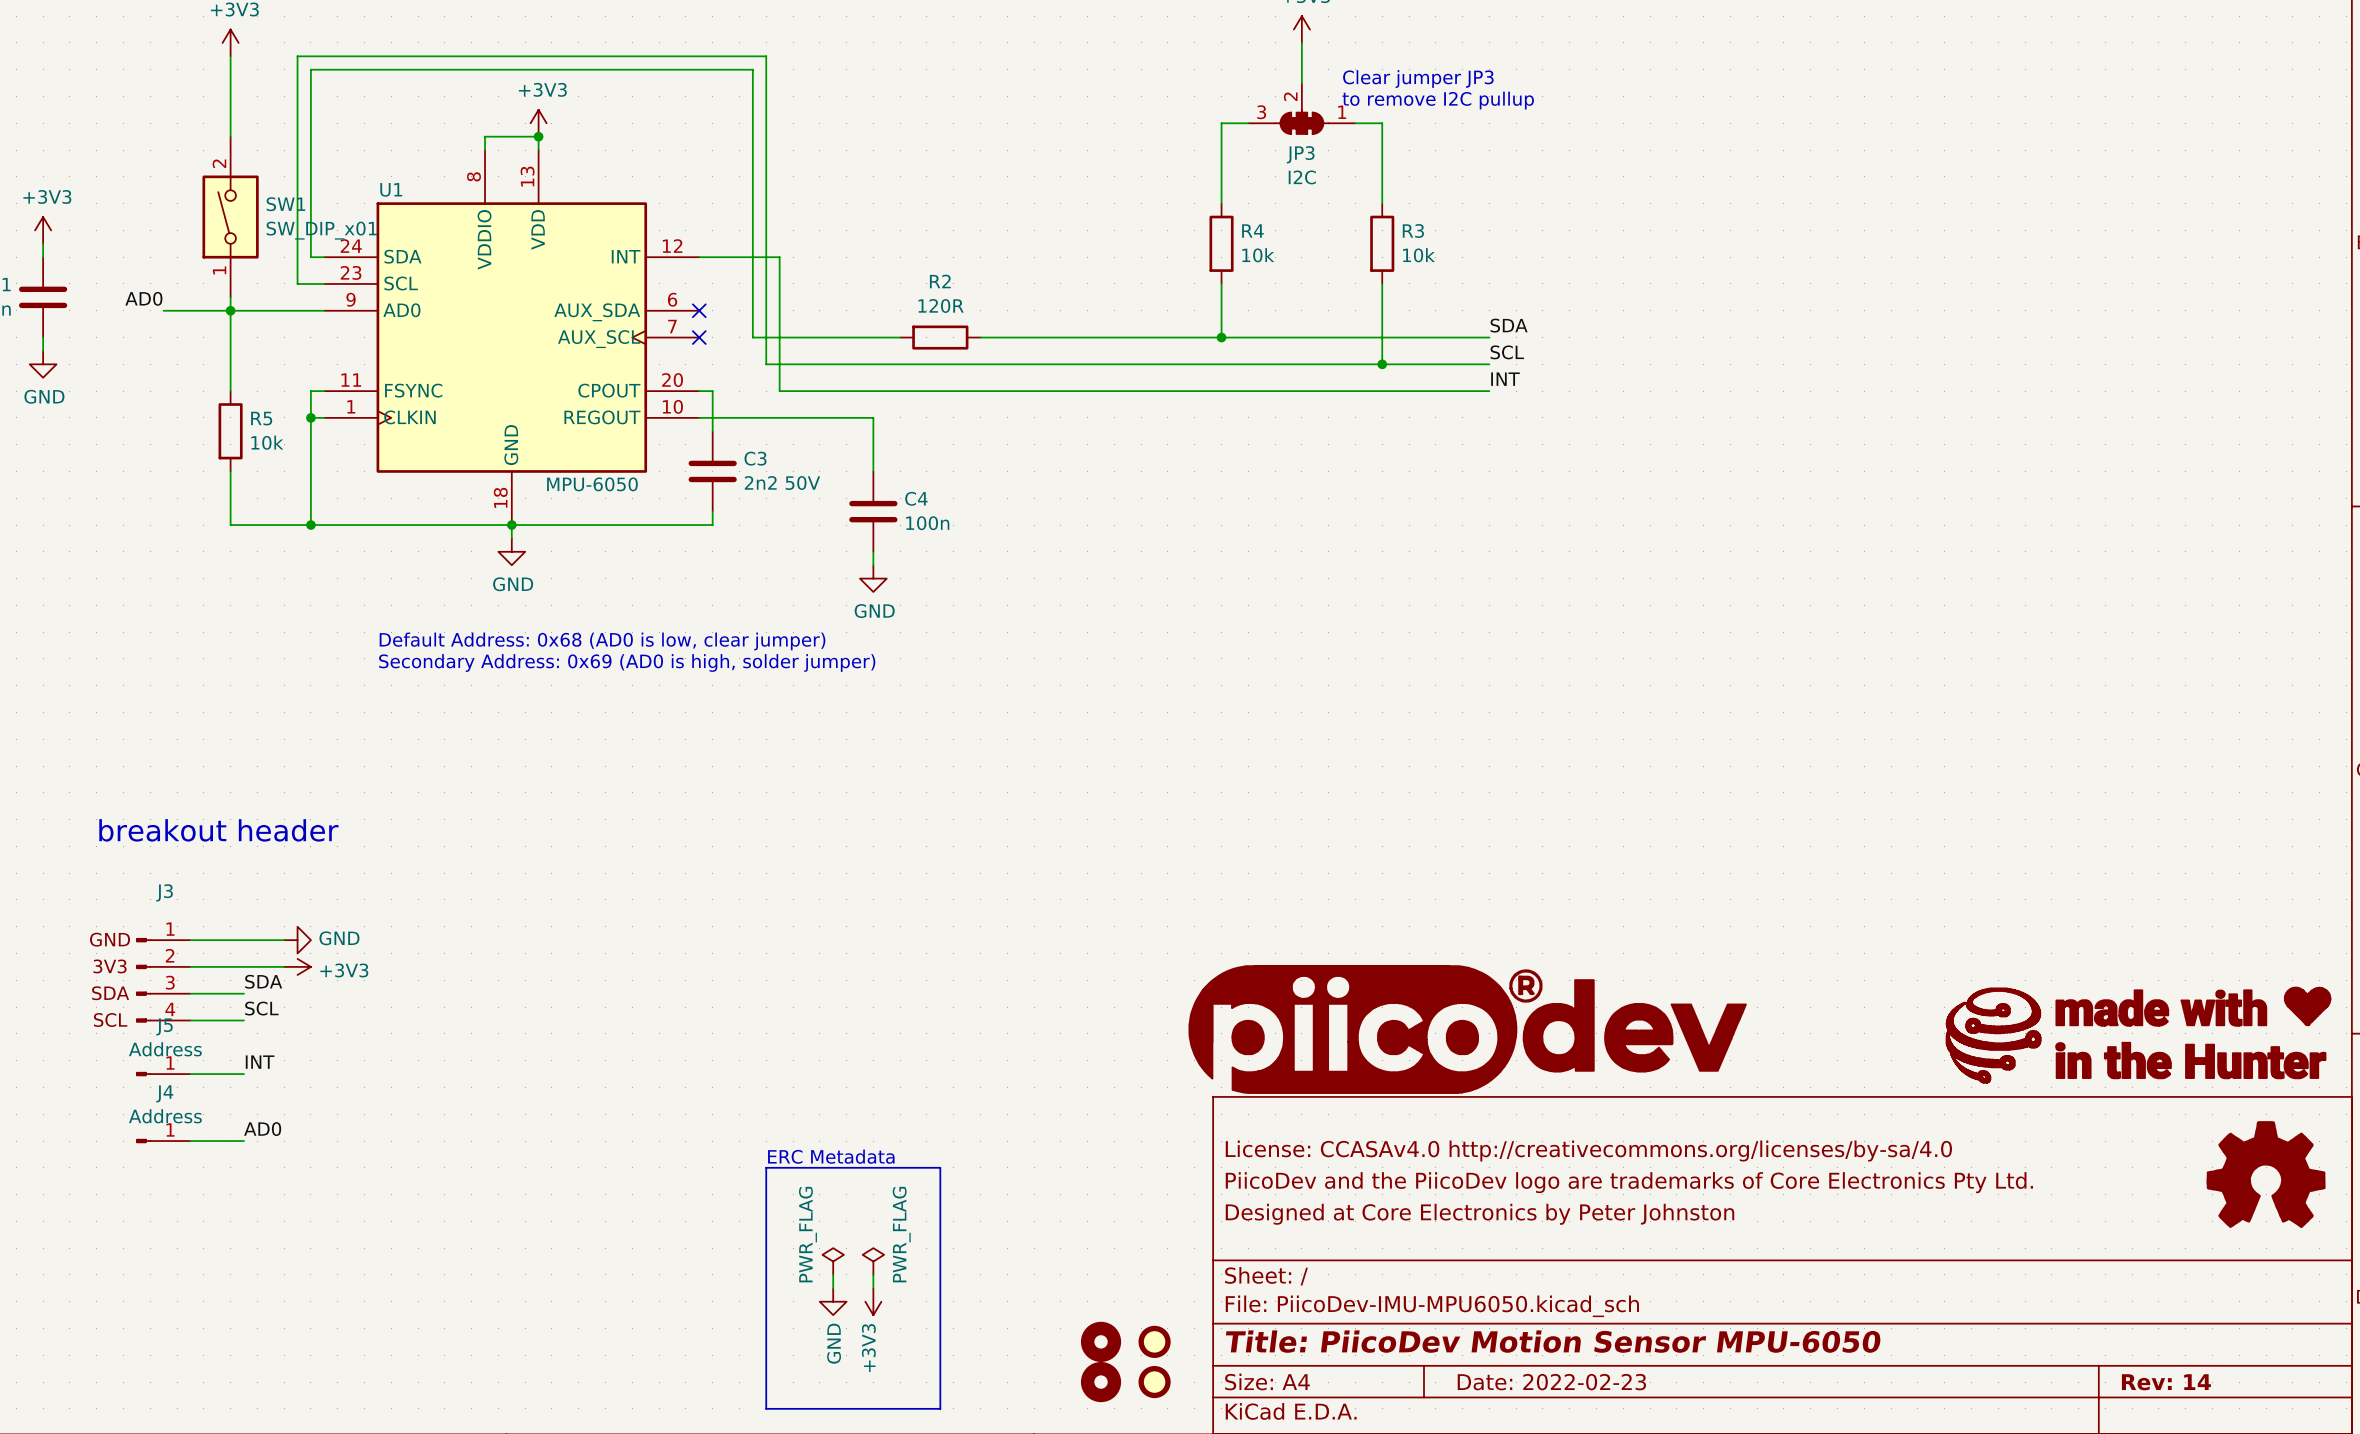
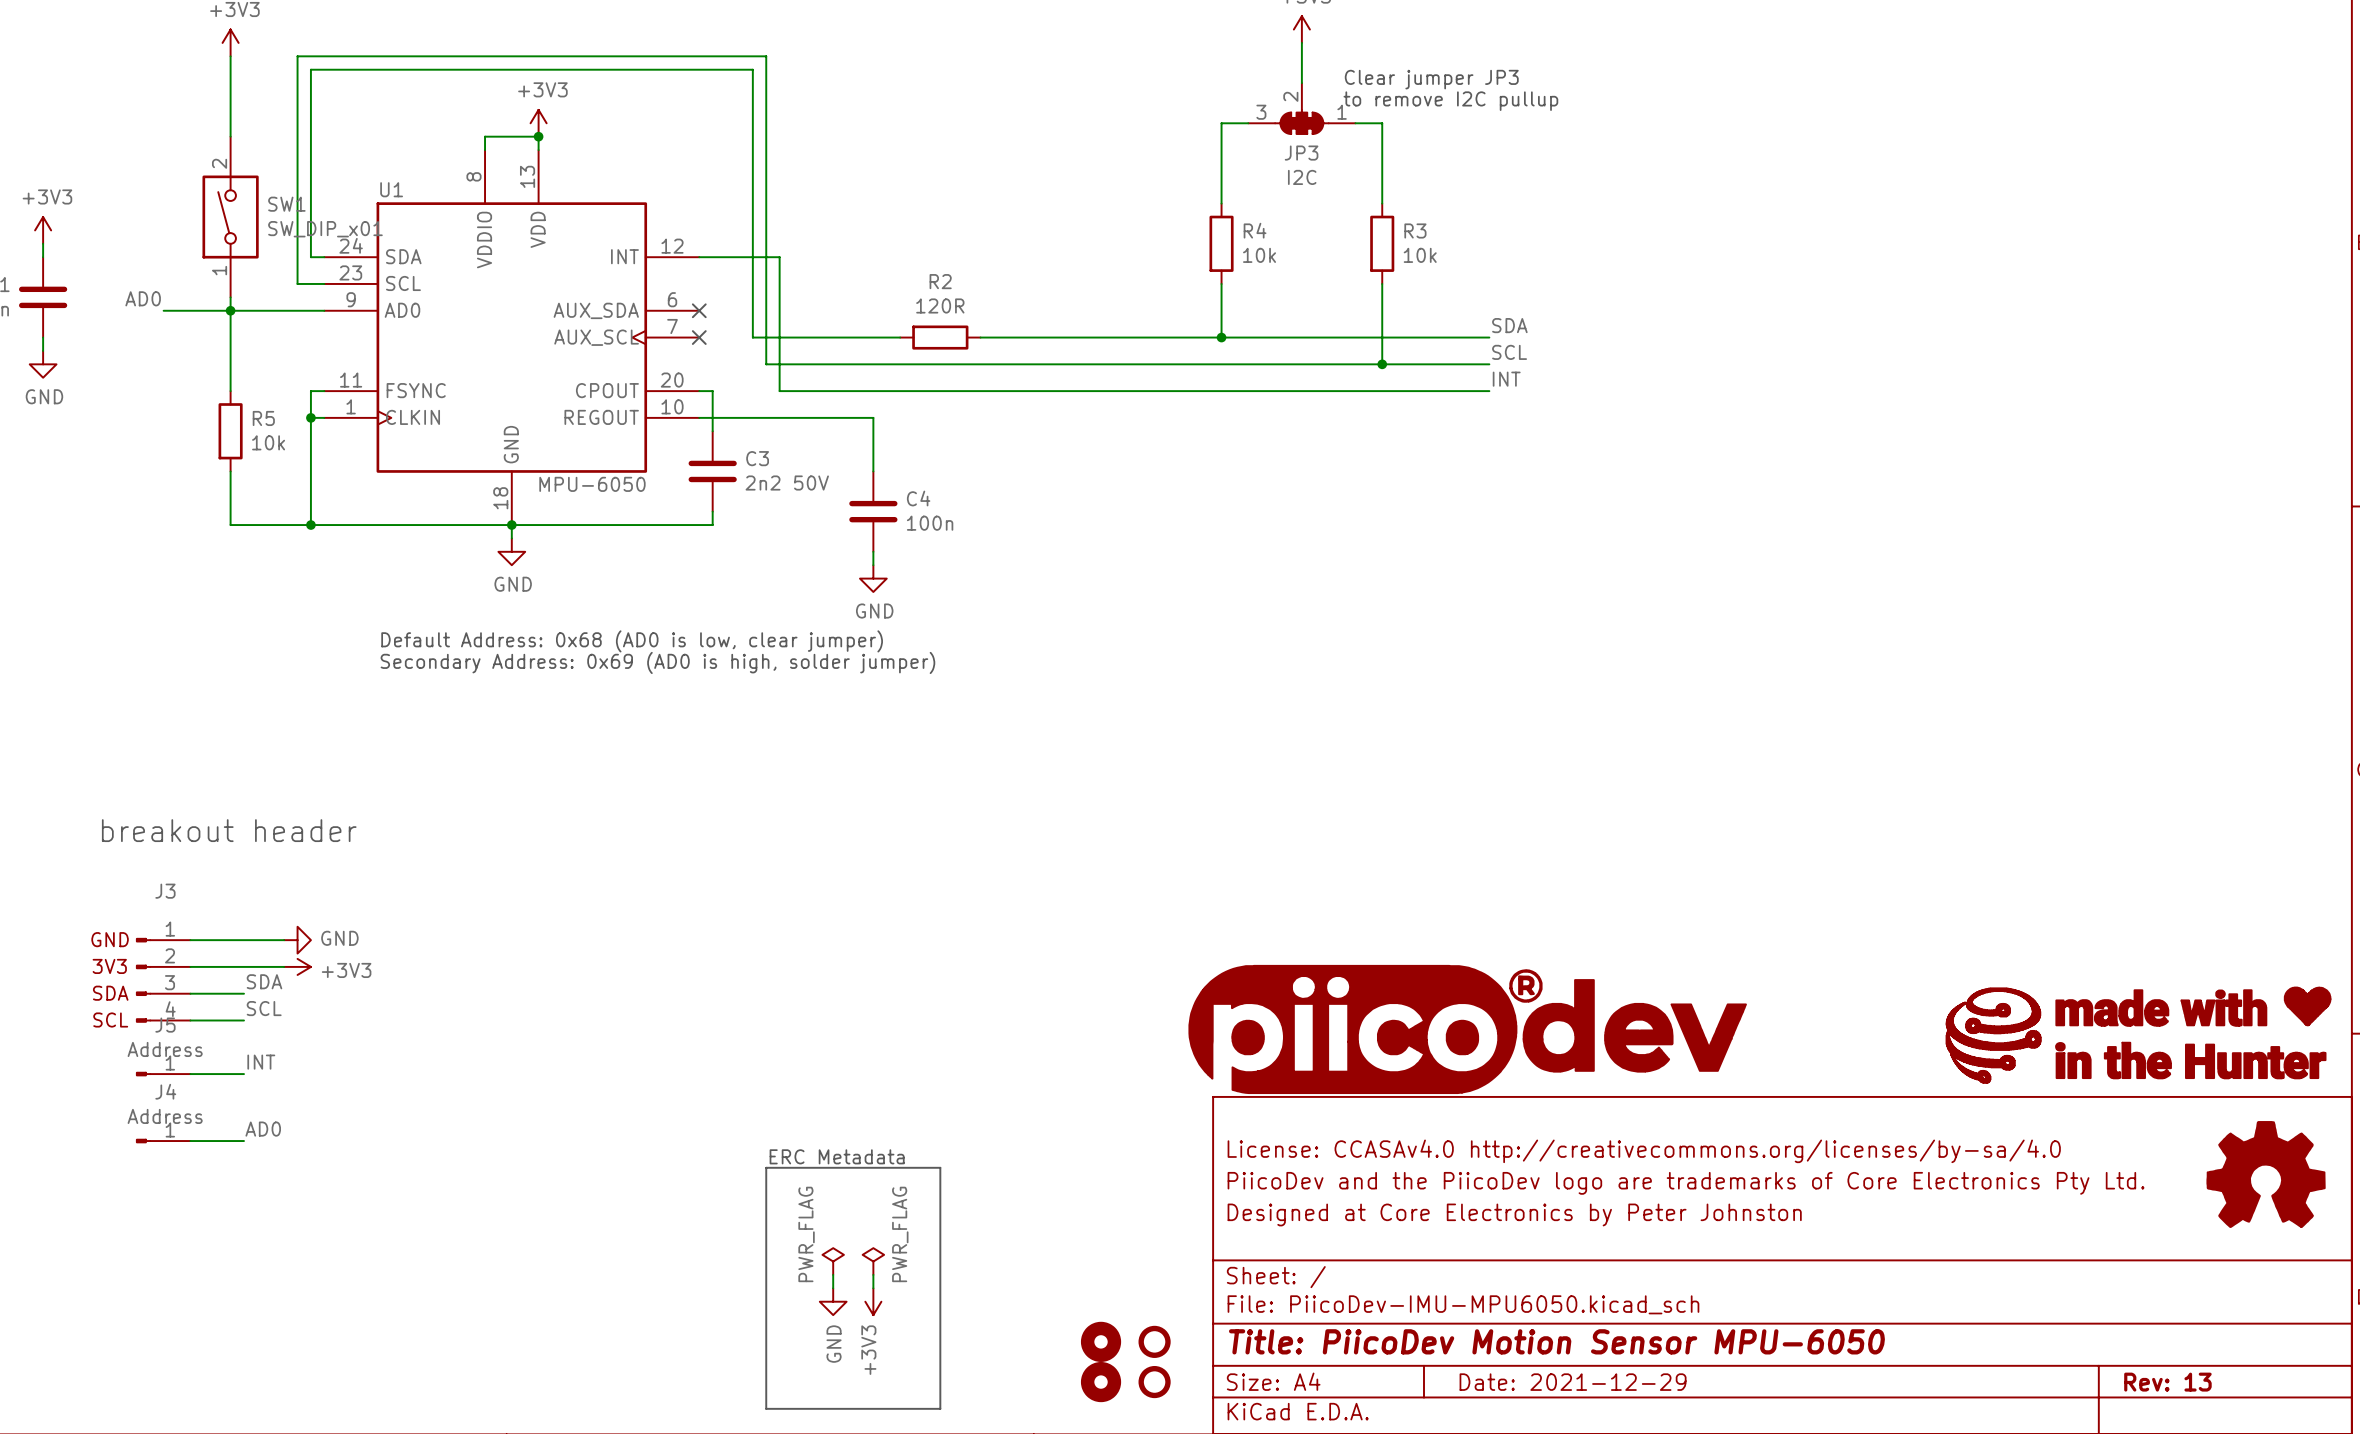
title block: Date: 2022-02-23 (1551, 1382) -> Date: 2021-12-29 (1573, 1382)
title block: Rev: 14 (2166, 1382) -> Rev: 13 (2167, 1382)

